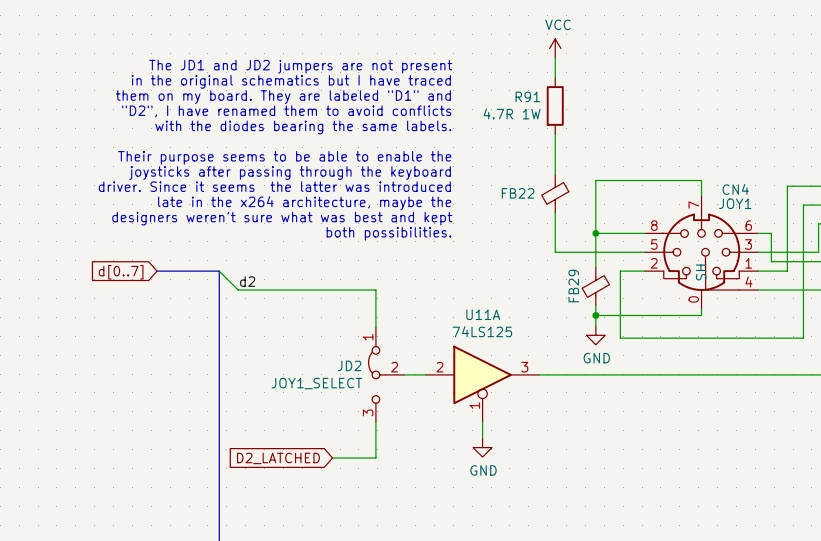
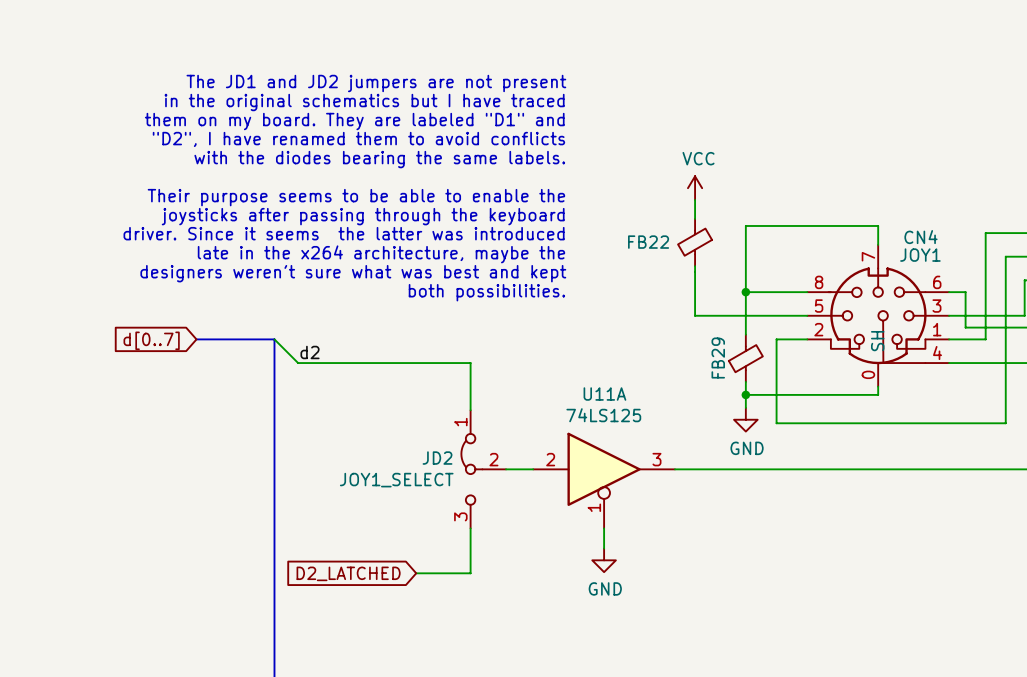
power symbol position: VCC (555, 48) -> VCC (695, 188)
wire: (555, 57) (555, 77) -> none
R91: 4.7R 1W (555, 105) -> none

